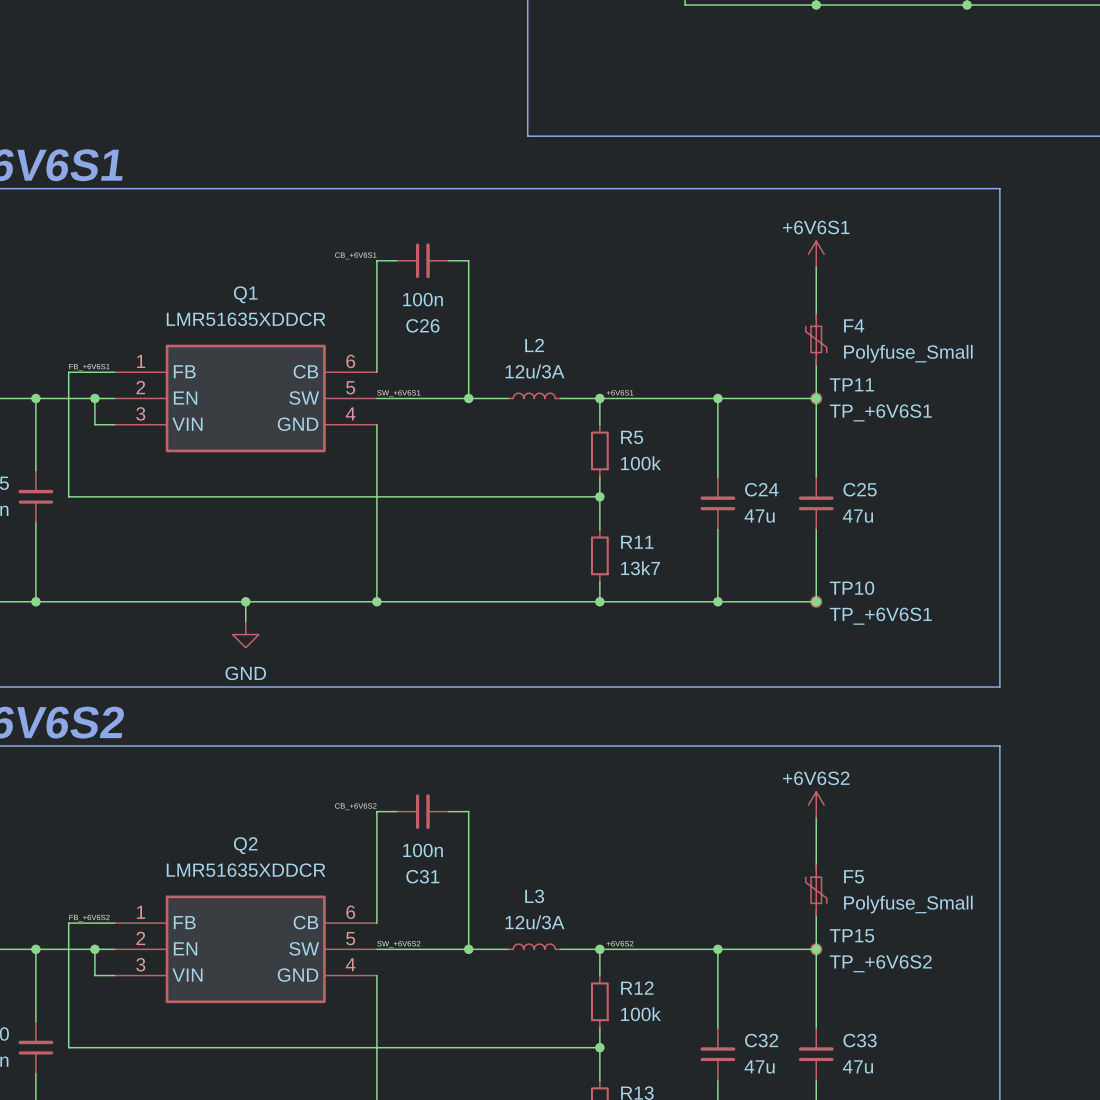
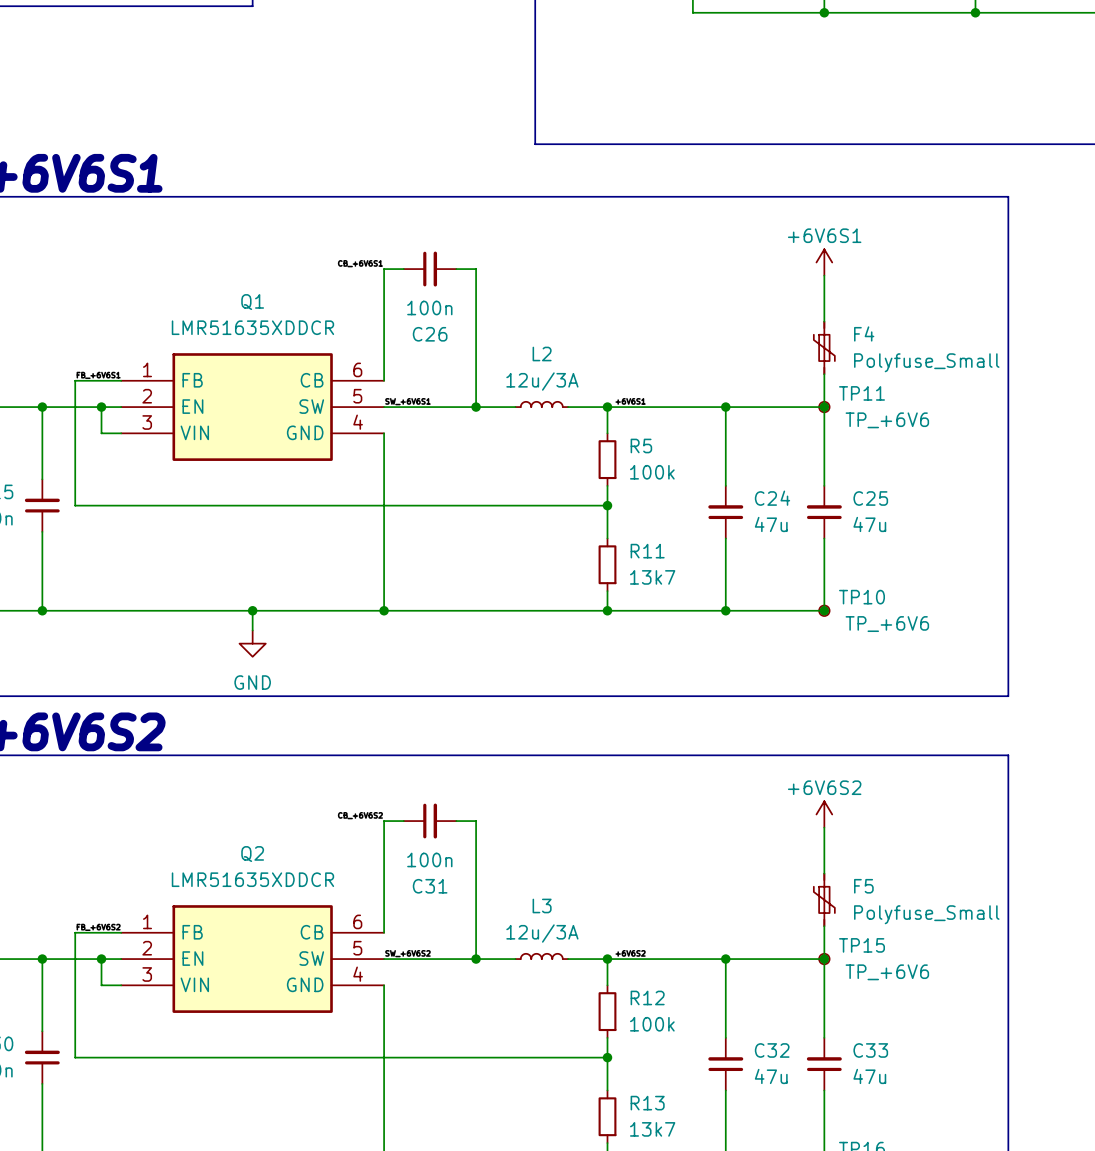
TP11 value: TP_+6V6S1 (880, 412) -> TP_+6V6 (887, 420)
TP10 value: TP_+6V6S1 (880, 616) -> TP_+6V6 (887, 624)
TP15 value: TP_+6V6S2 (880, 963) -> TP_+6V6 (887, 972)

